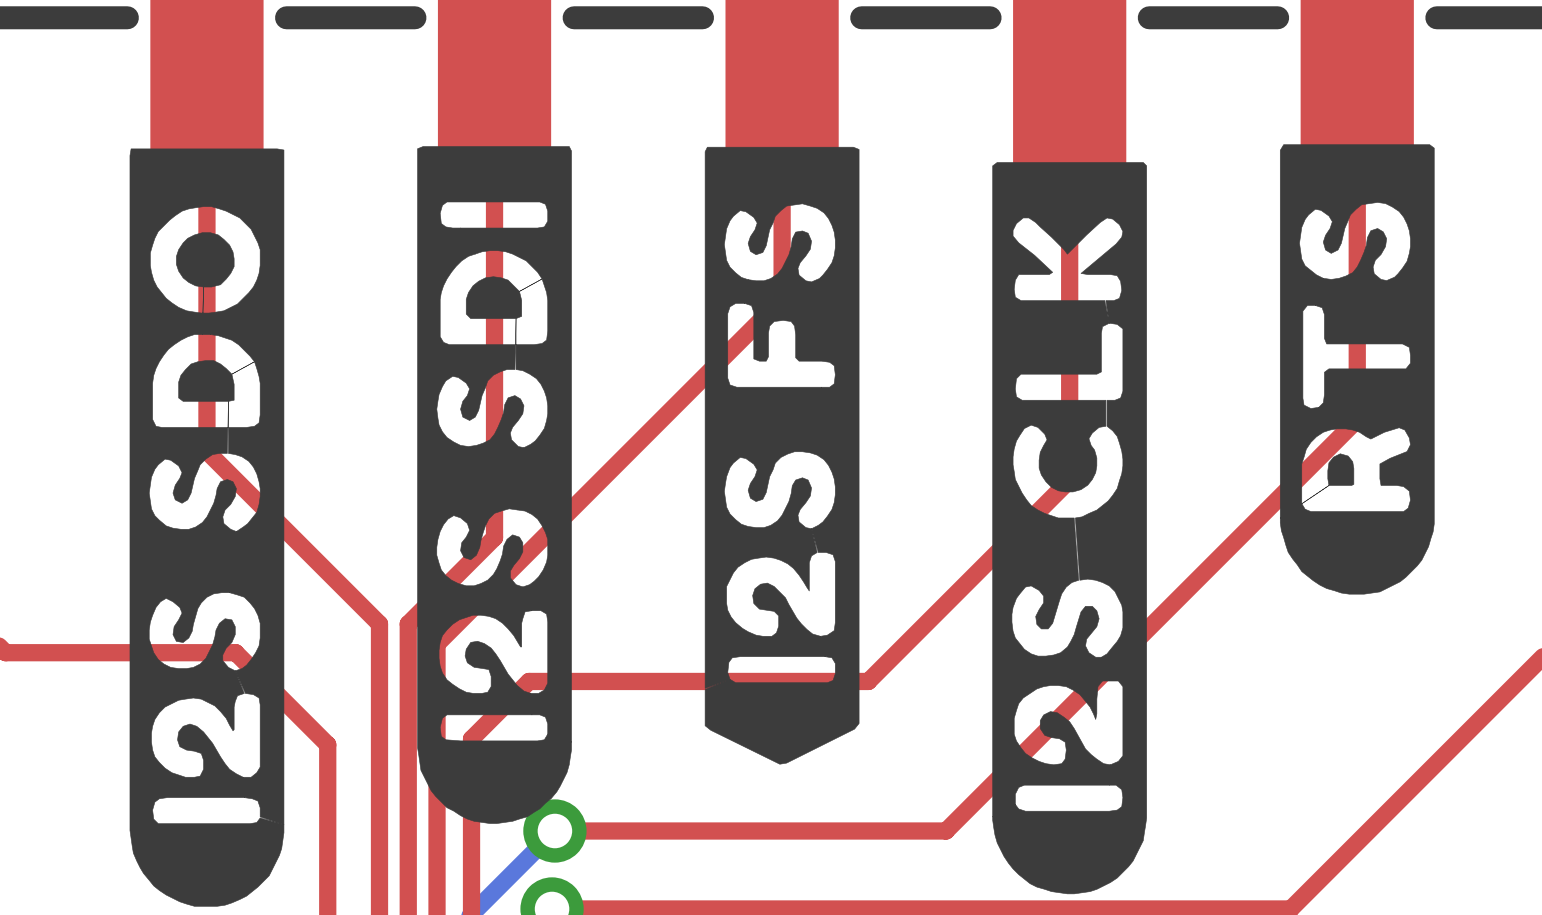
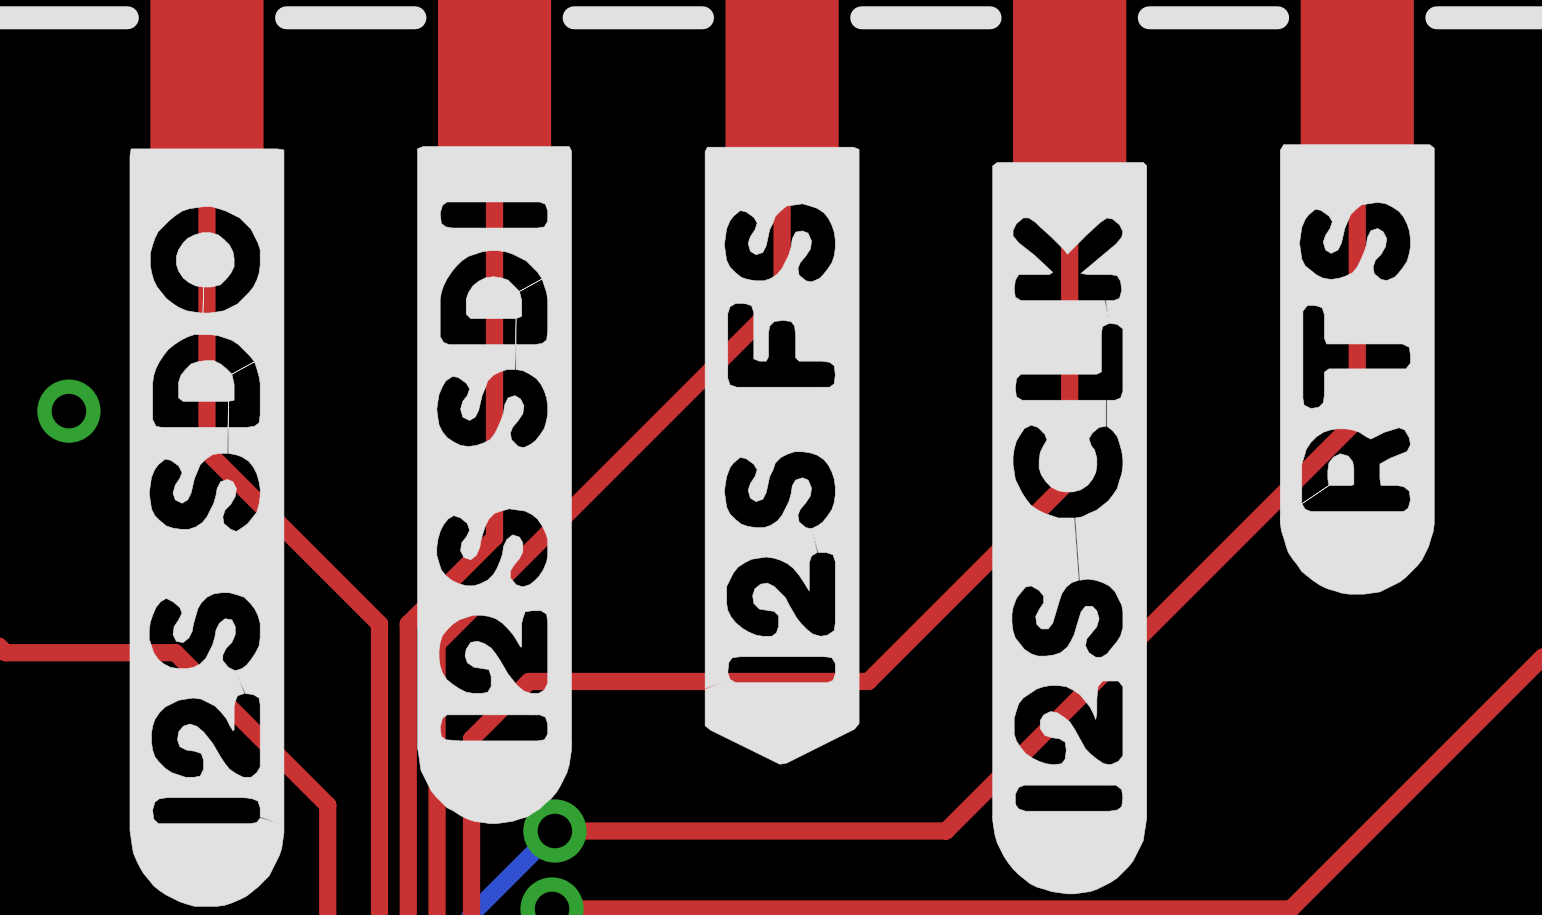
via: none -> (68, 411)
top track: (175, 652) (235, 652) (327, 744) (327, 805) -> (175, 652) (327, 805)

